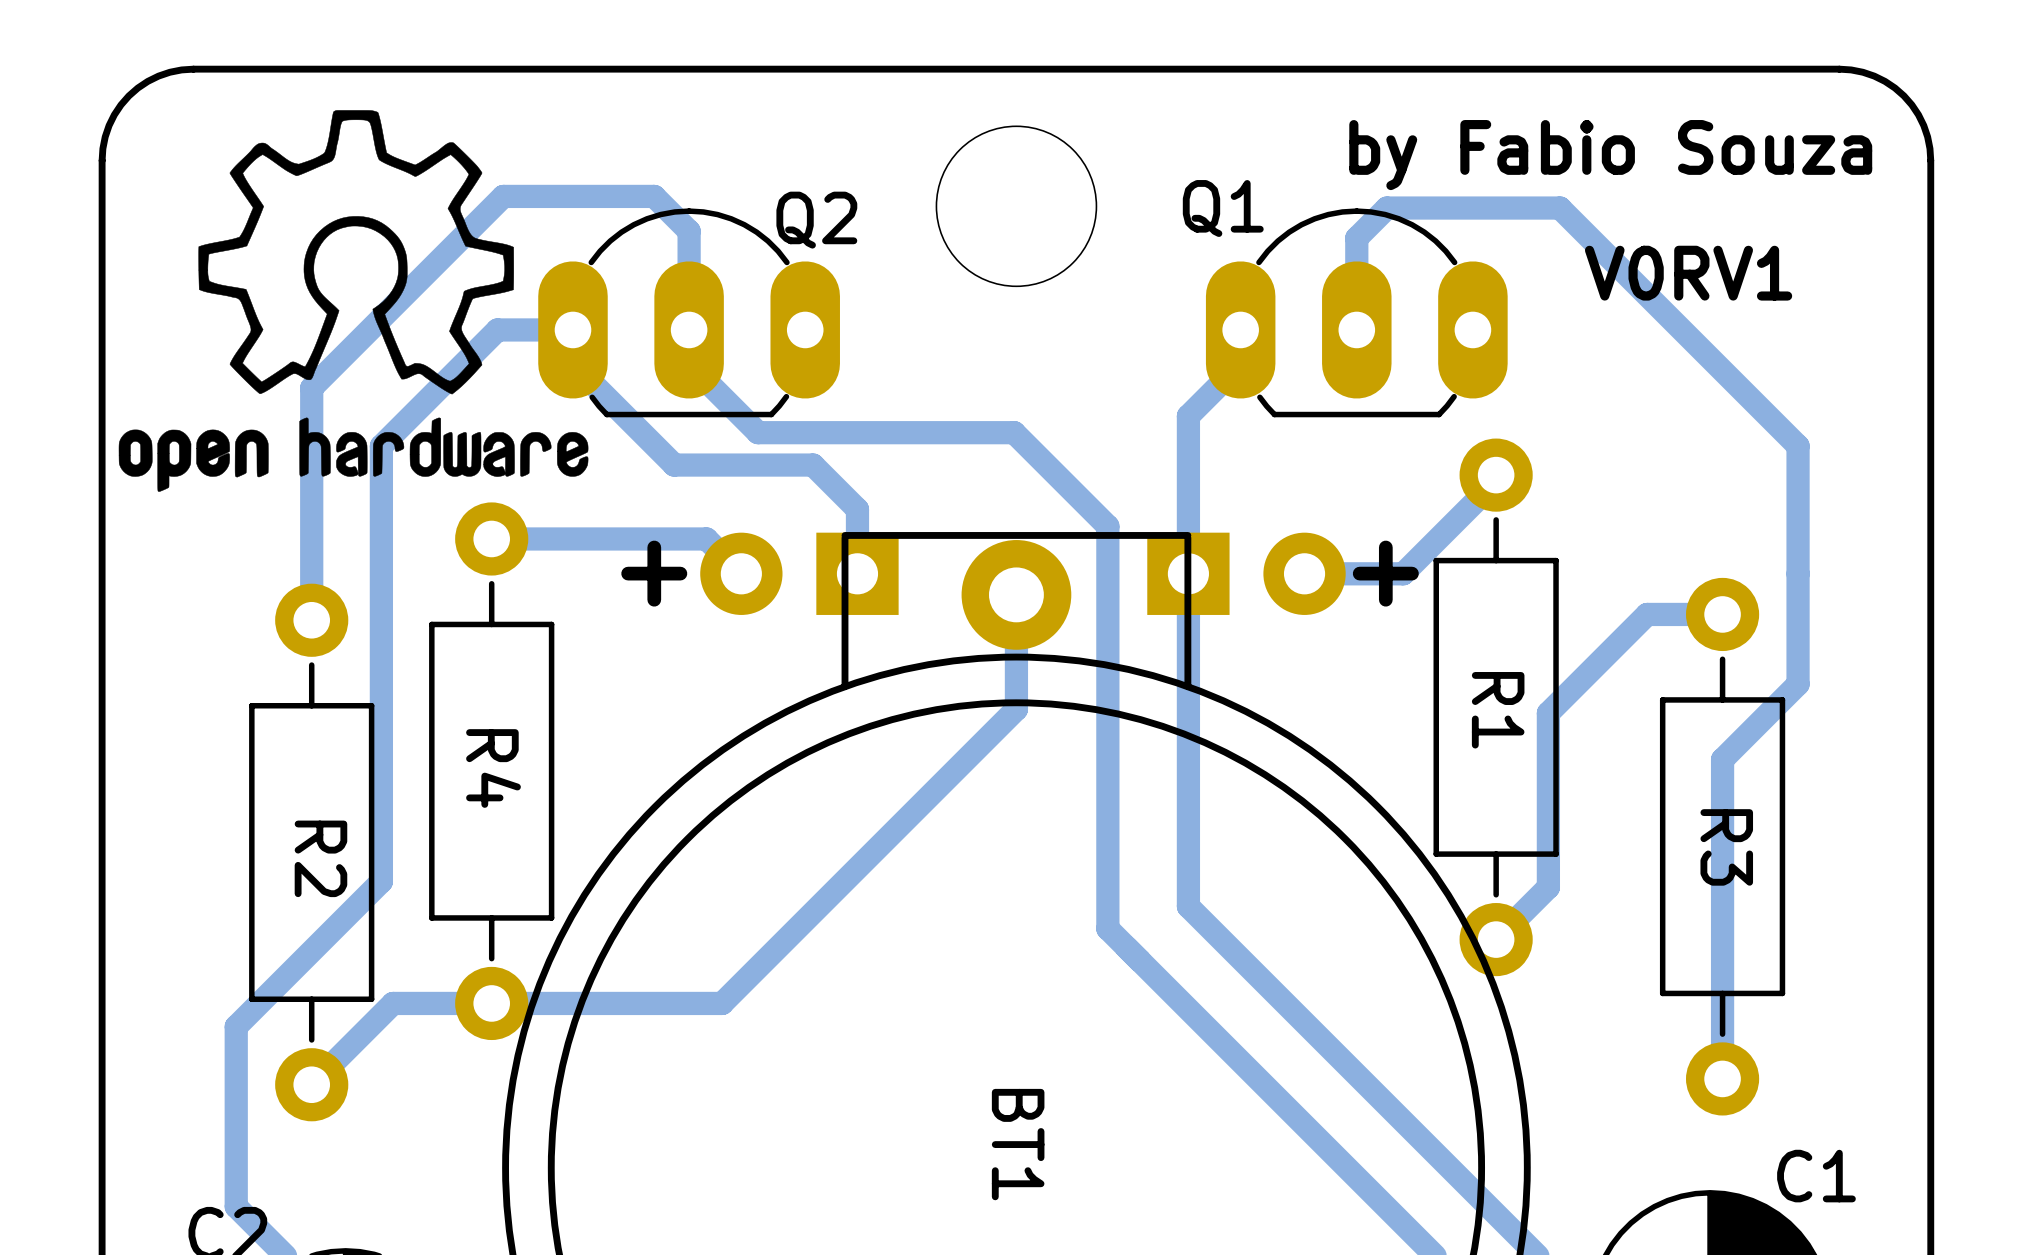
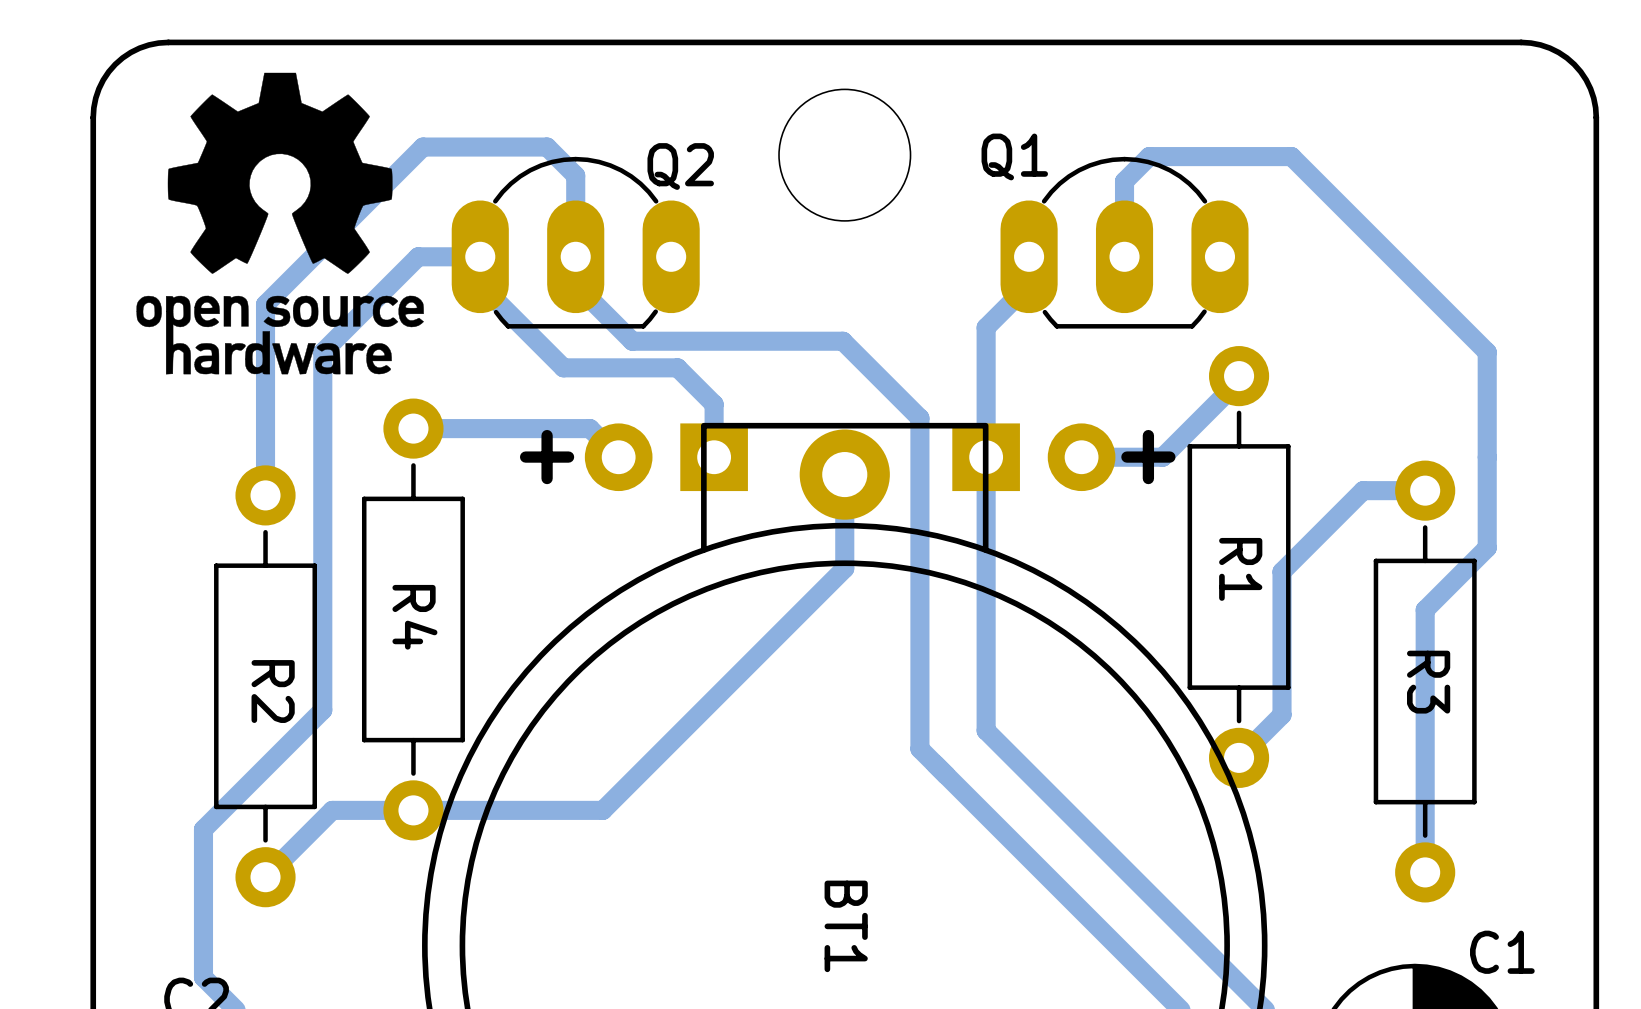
drawing shape: [118, 110, 589, 492] -> [136, 72, 424, 375]
text: by Fabio Souza (1610, 155) -> none
text: V0RV1 (1688, 273) -> none

